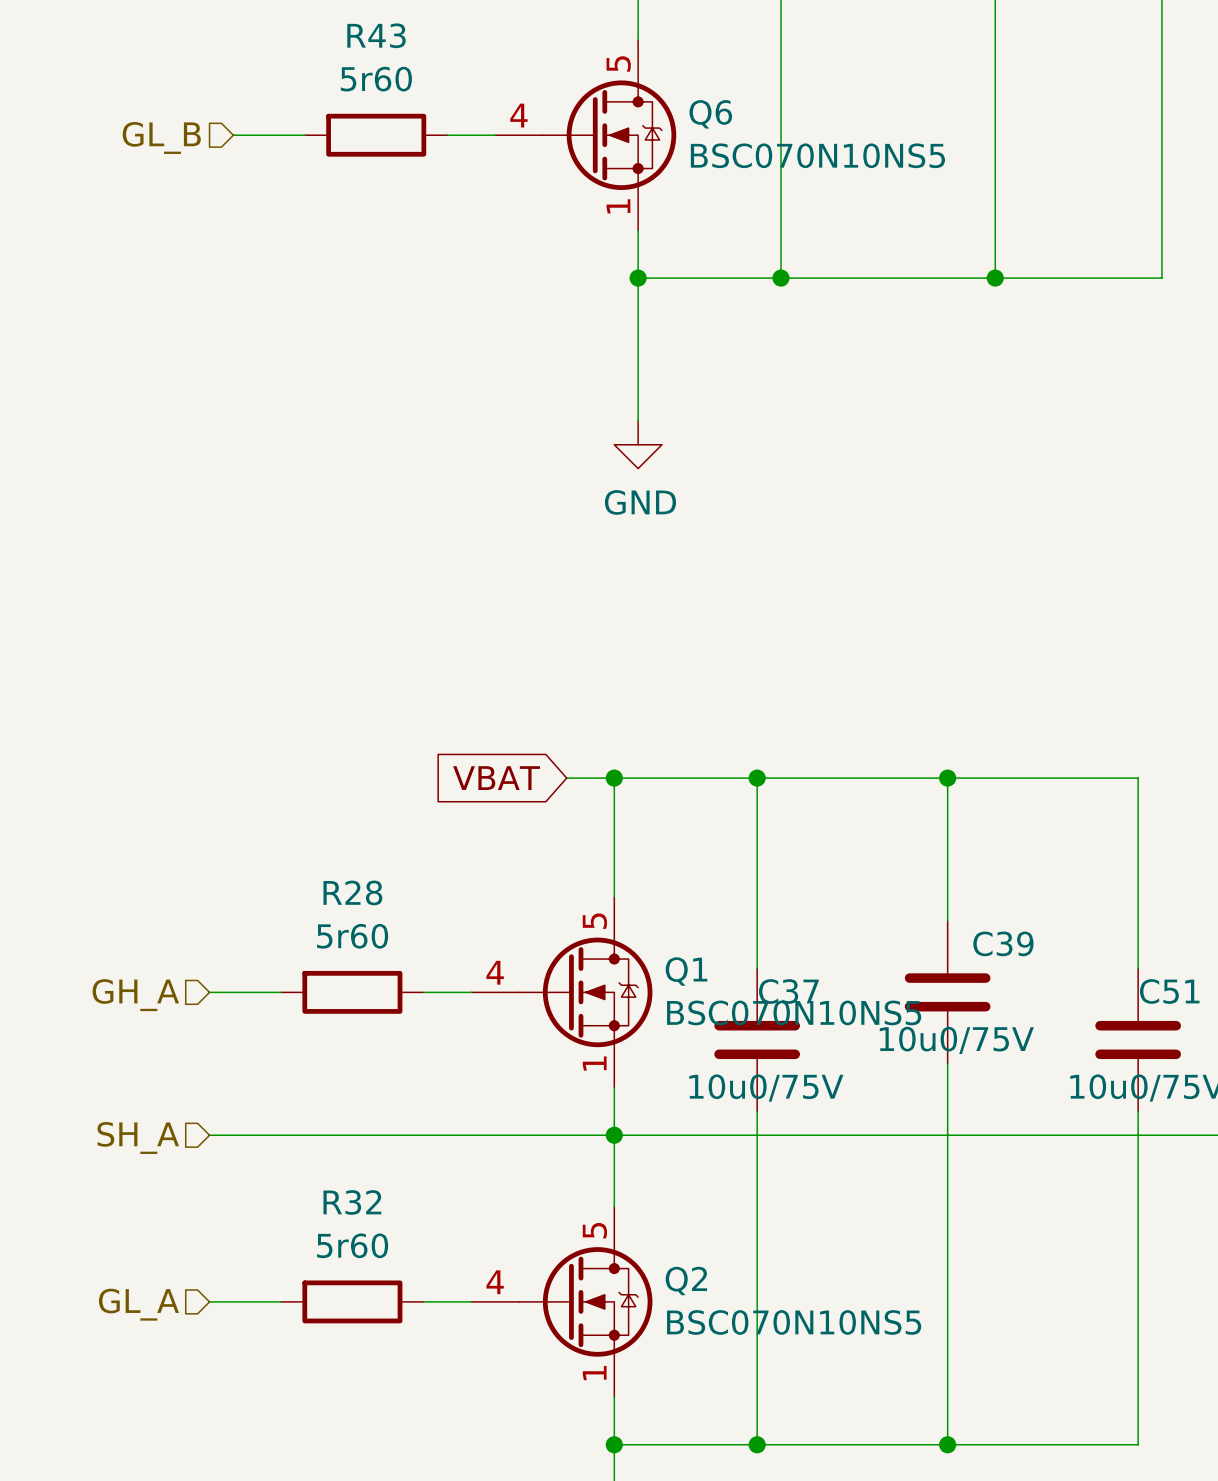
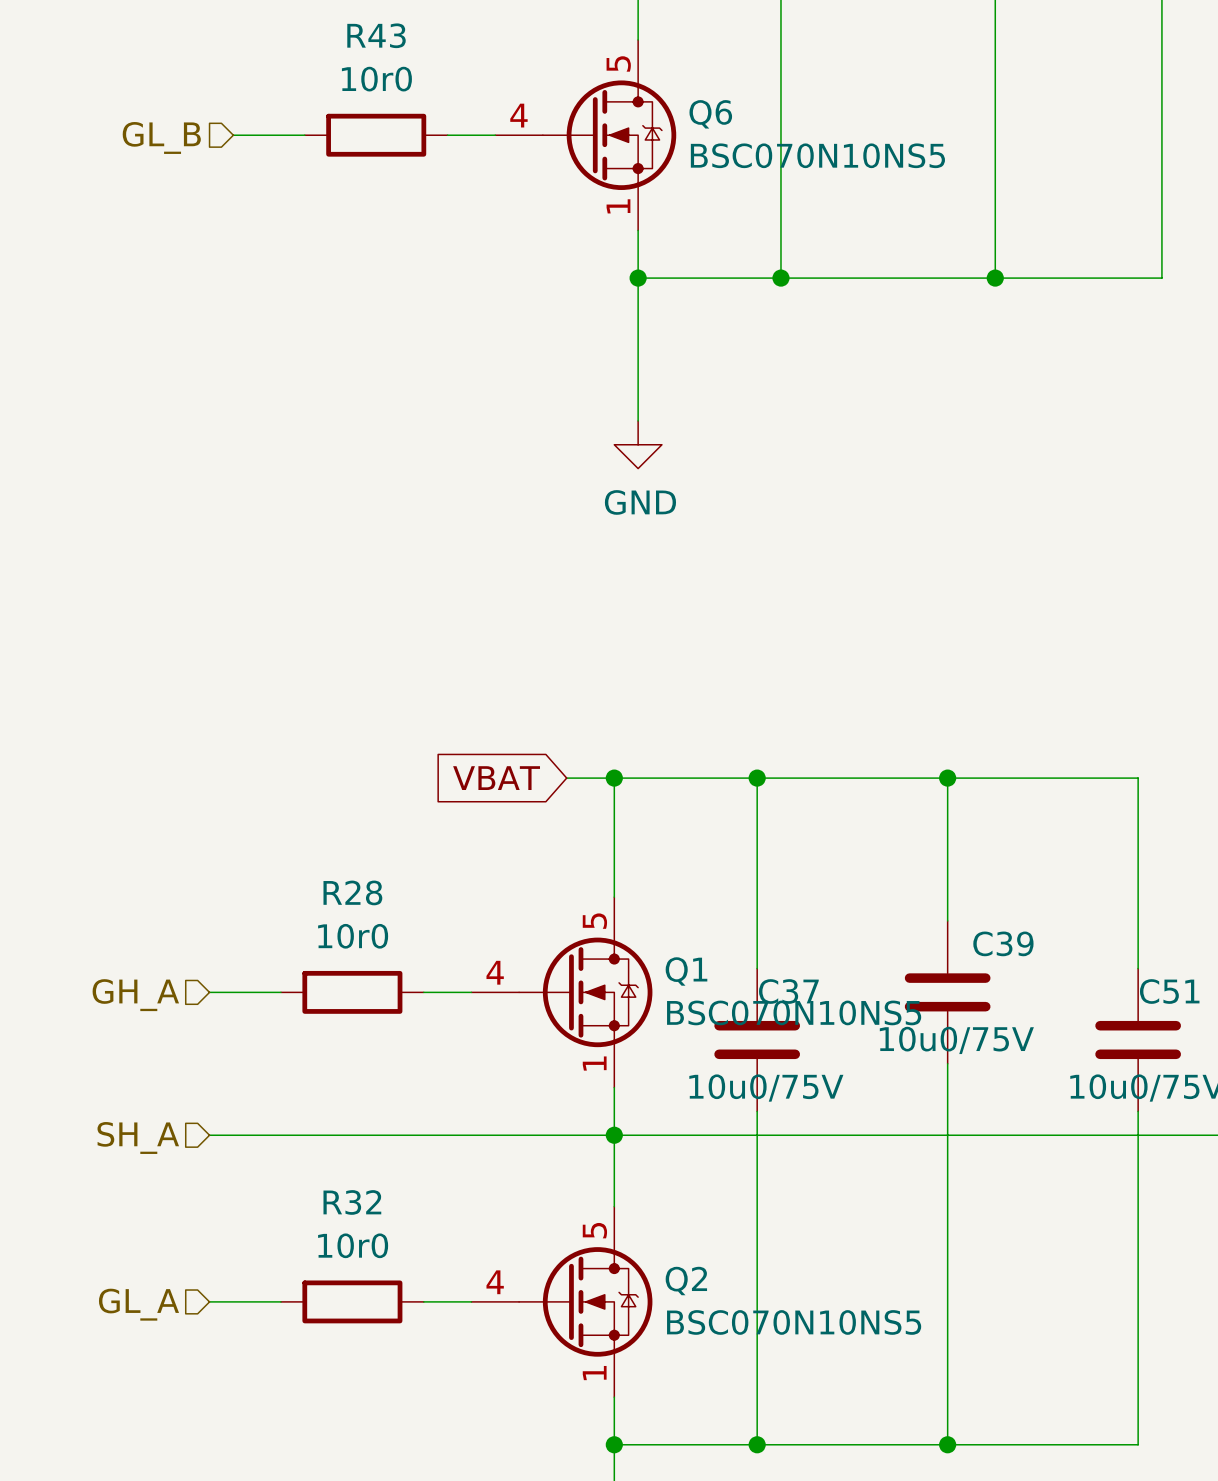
R43 value: 5r60 (376, 79) -> 10r0 (376, 79)
R28 value: 5r60 (352, 936) -> 10r0 (353, 936)
R32 value: 5r60 (352, 1245) -> 10r0 (353, 1245)

